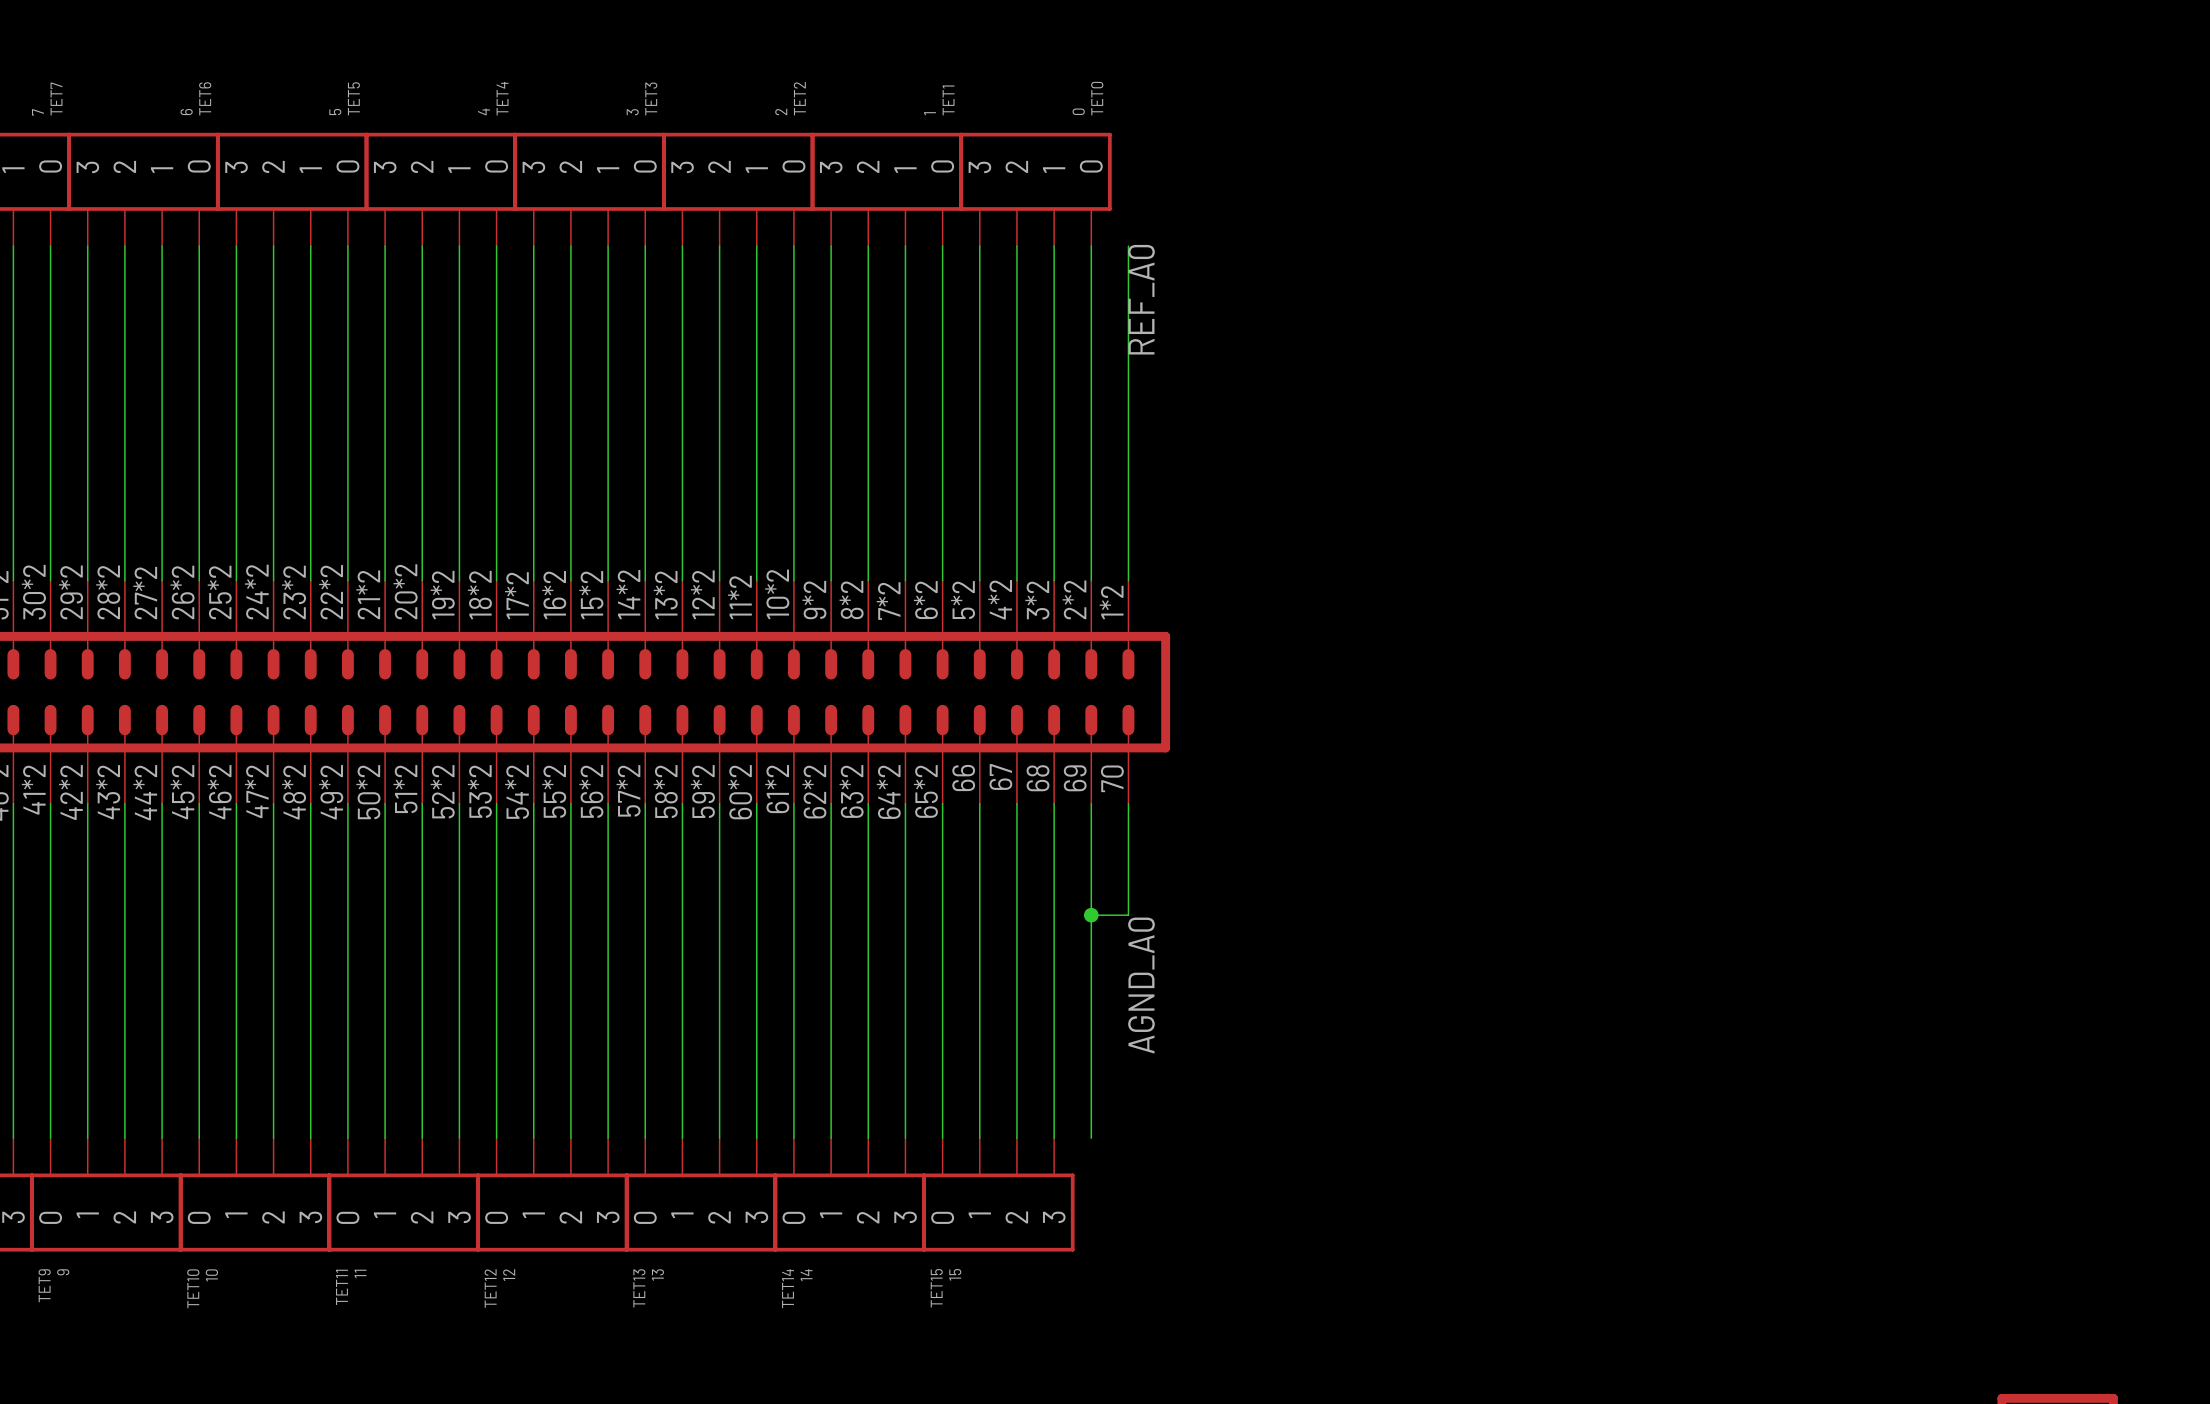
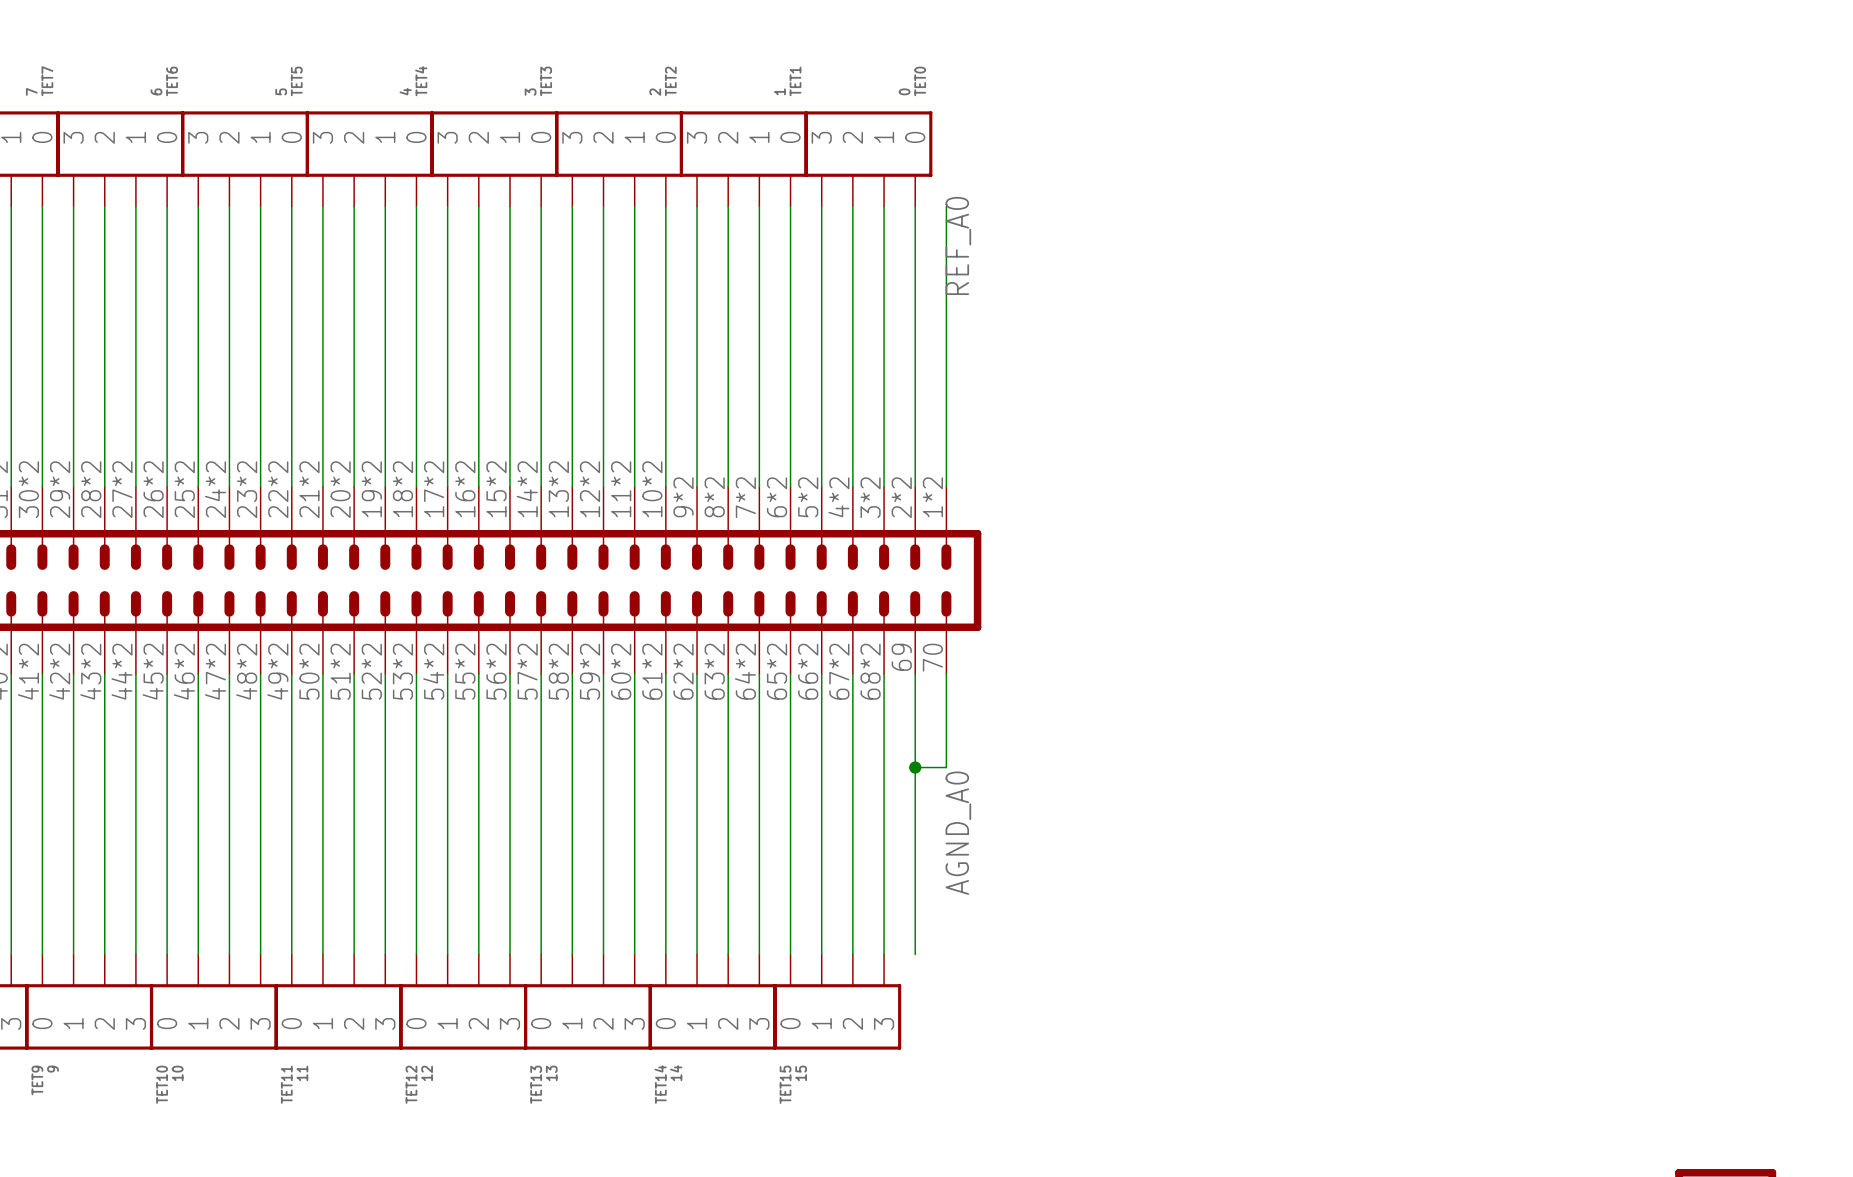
part pin number: 67 (1000, 776) -> 67*2 (839, 671)
part pin number: 66 (963, 777) -> 66*2 (808, 671)
part pin number: 68 (1037, 778) -> 68*2 (870, 671)

